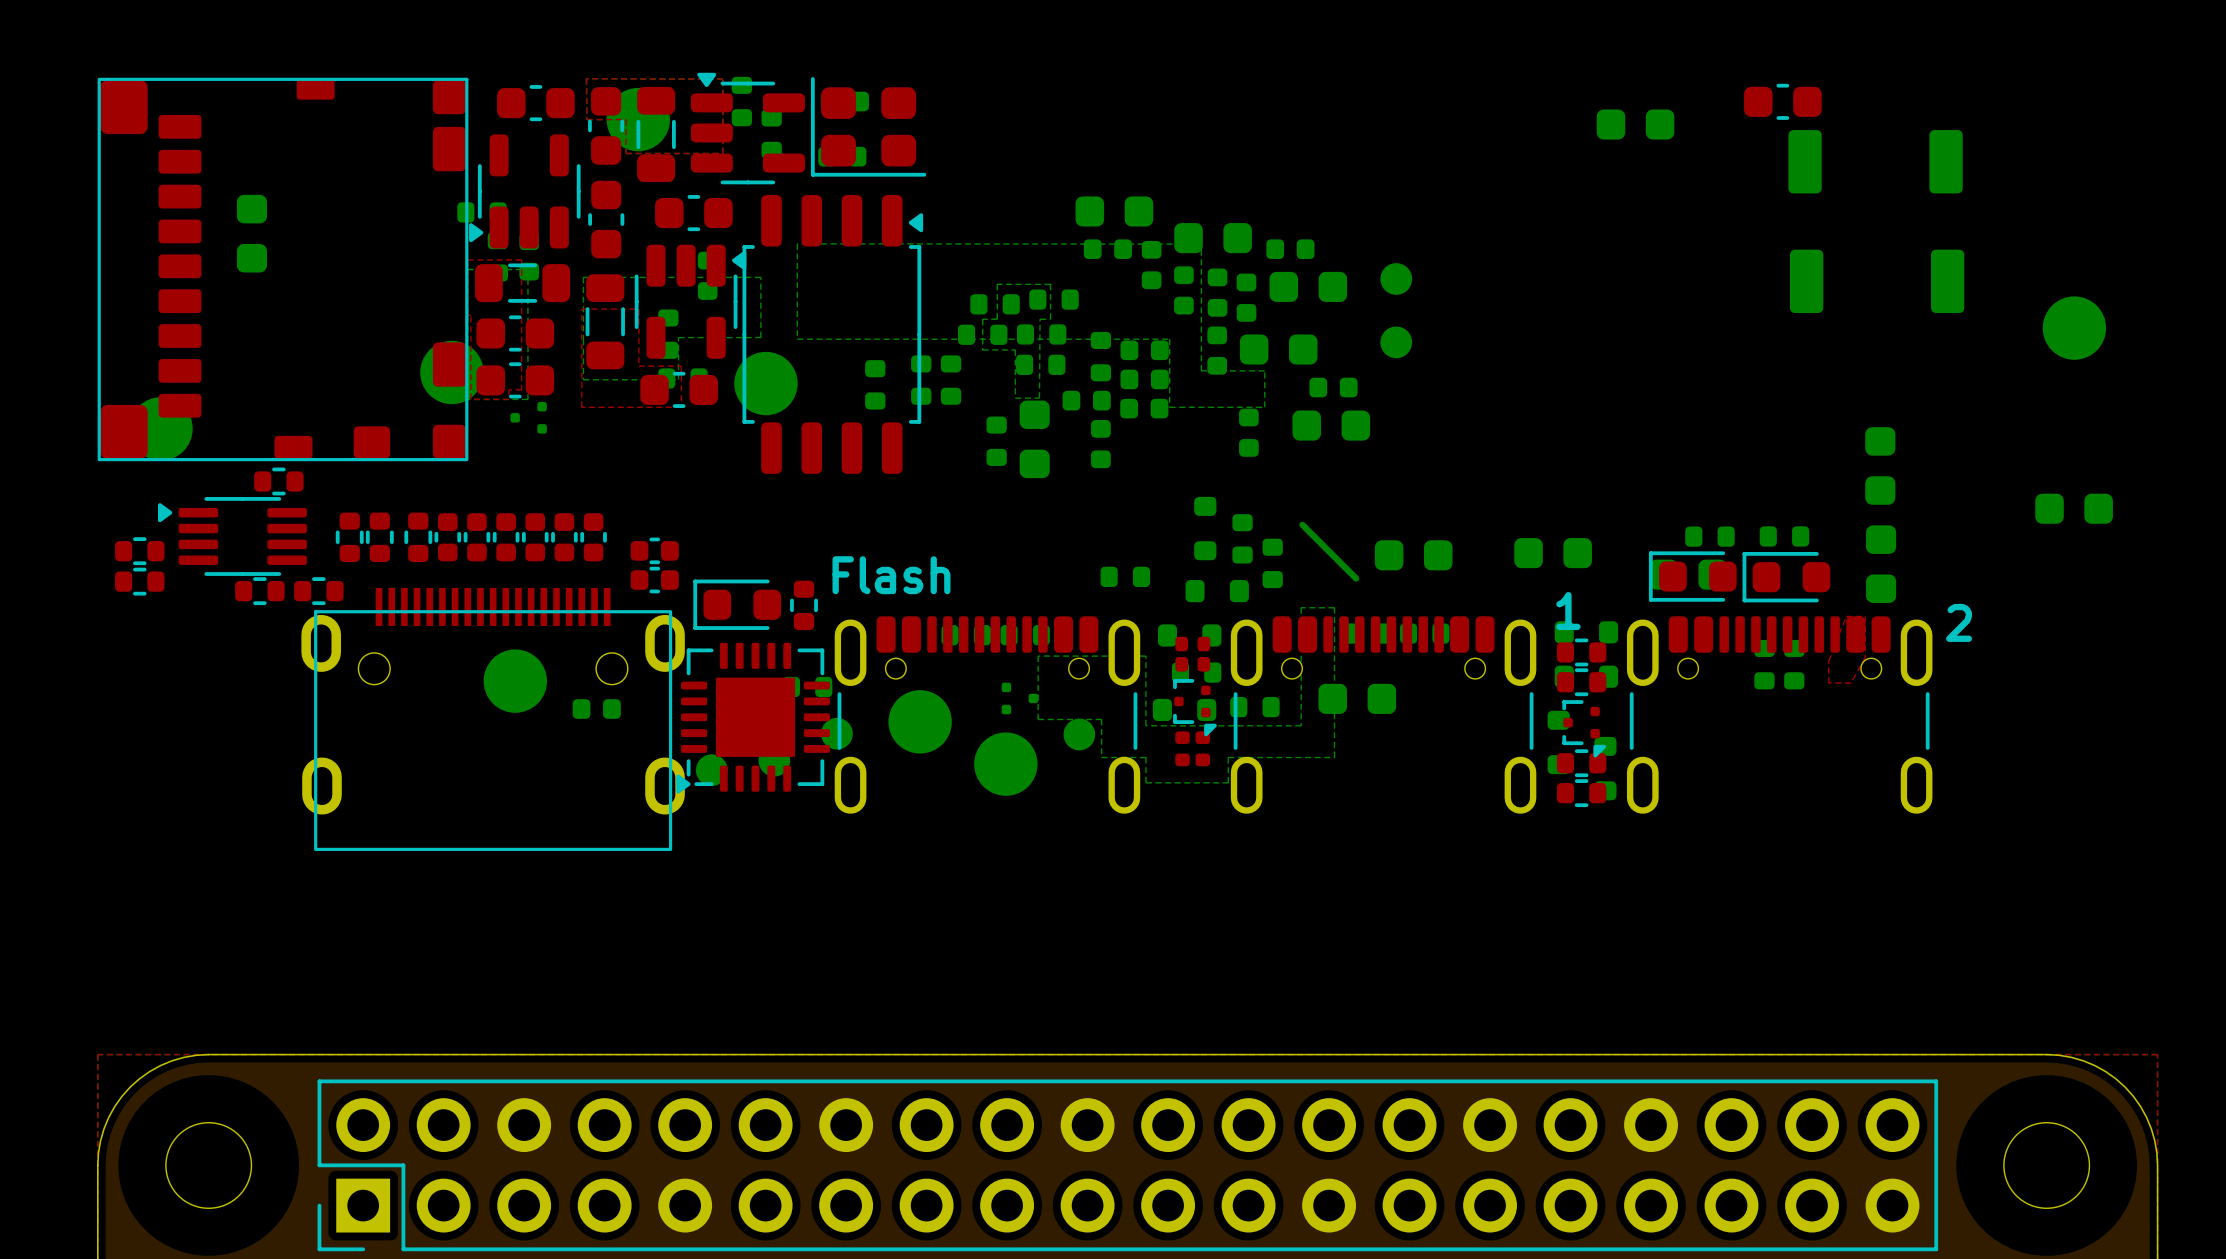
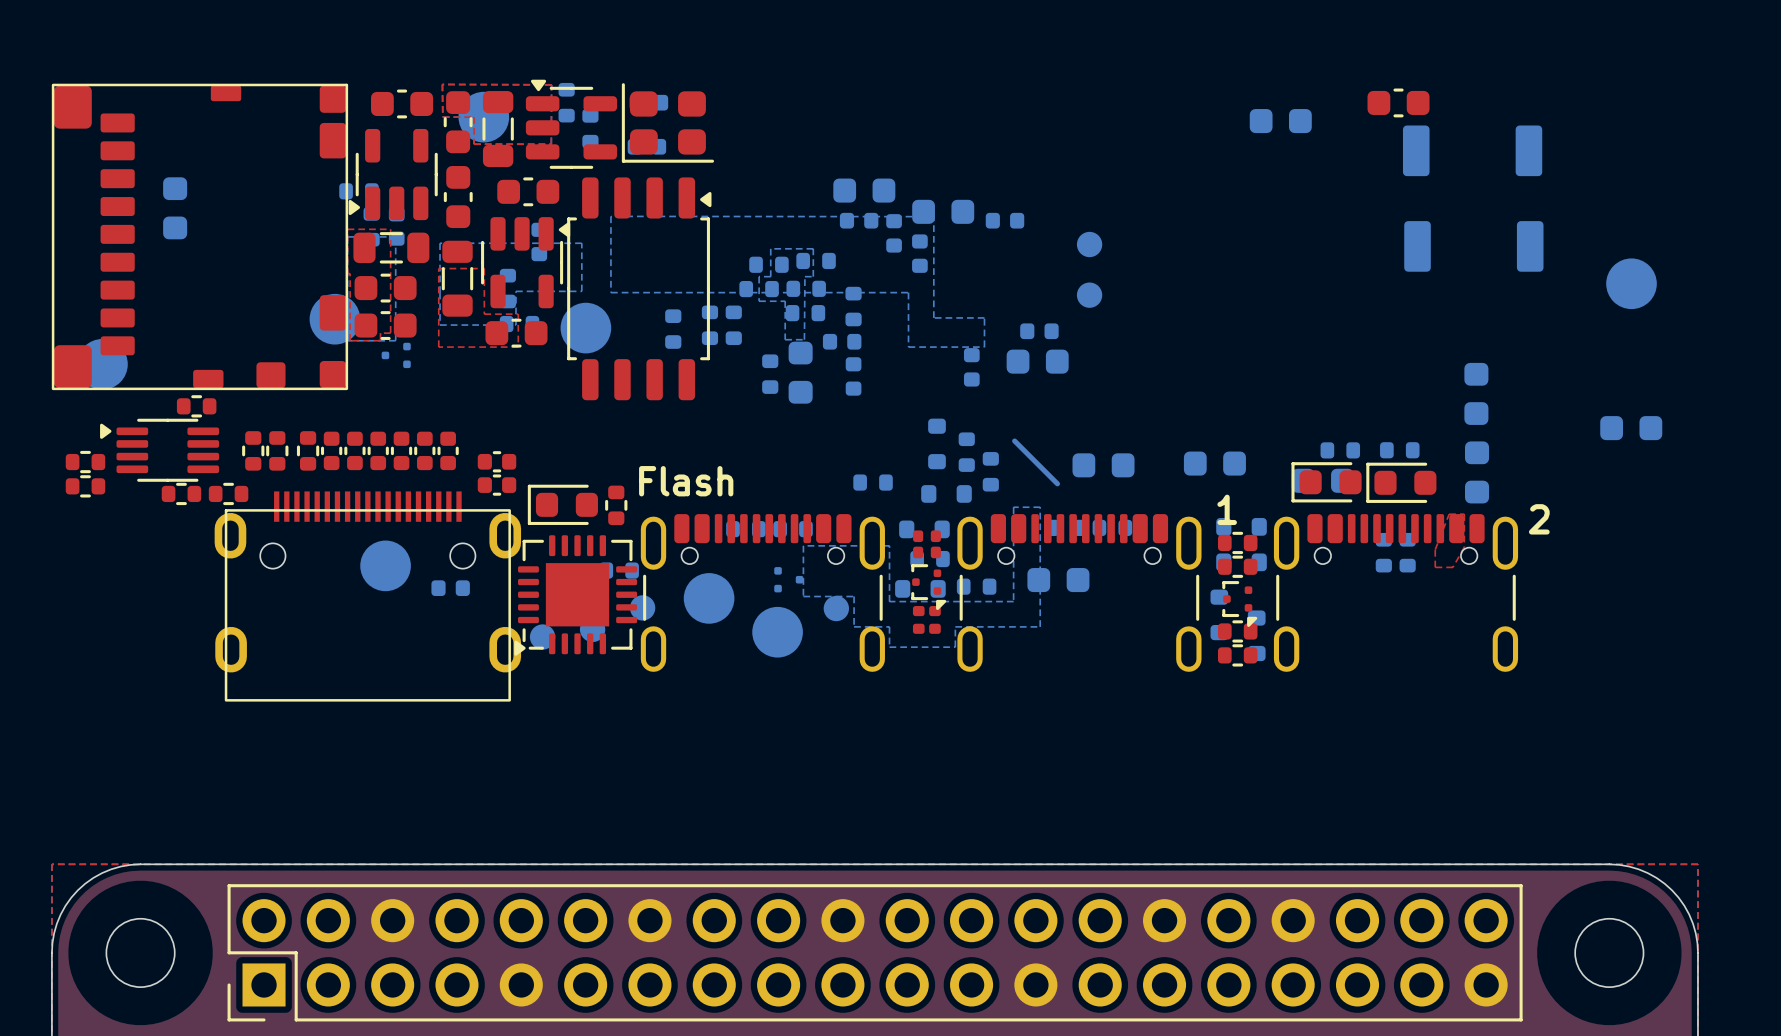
part: (1308, 286) -> none
part: (1217, 292) -> none
part: (1246, 297) -> none
part: (1278, 349) -> none
part: (1144, 350) -> none
part: (1217, 350) -> none
part: (1144, 379) -> none
part: (1144, 408) -> none

